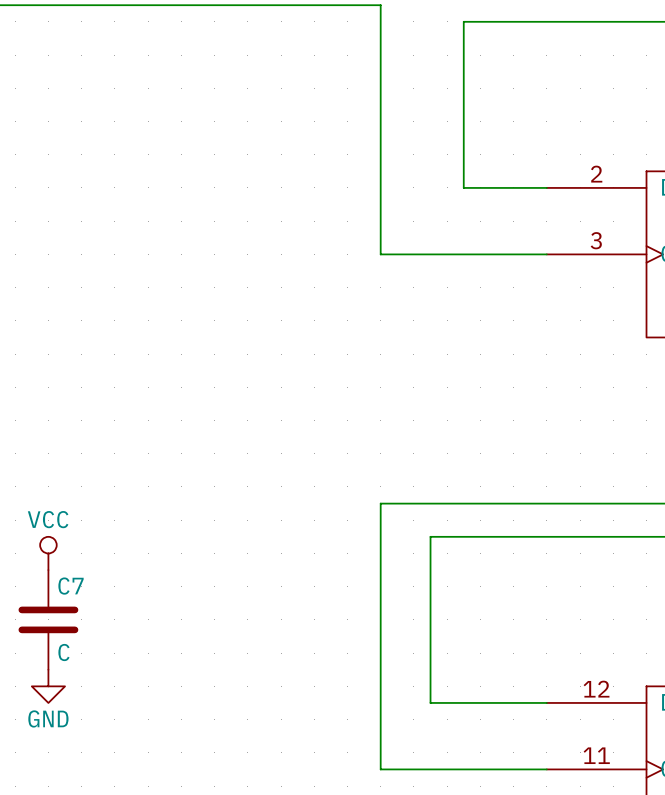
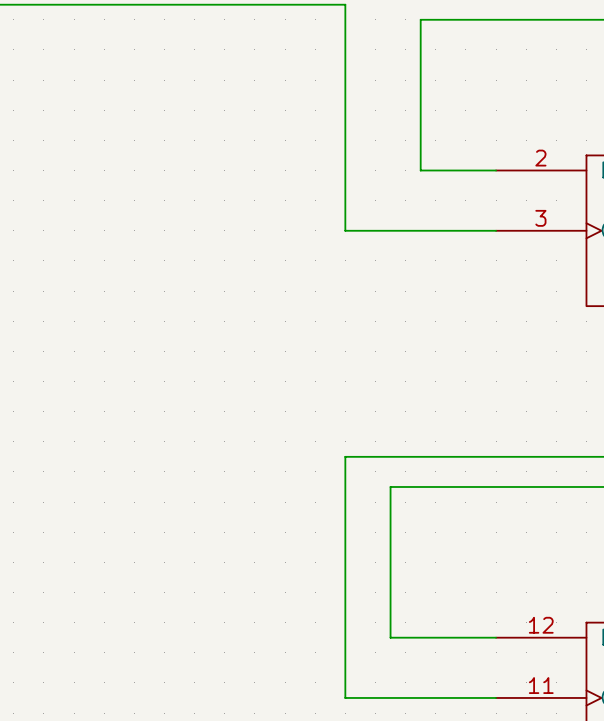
power symbol: VCC (48, 553) -> none
C7: C (48, 619) -> none
power symbol: GND (48, 686) -> none

